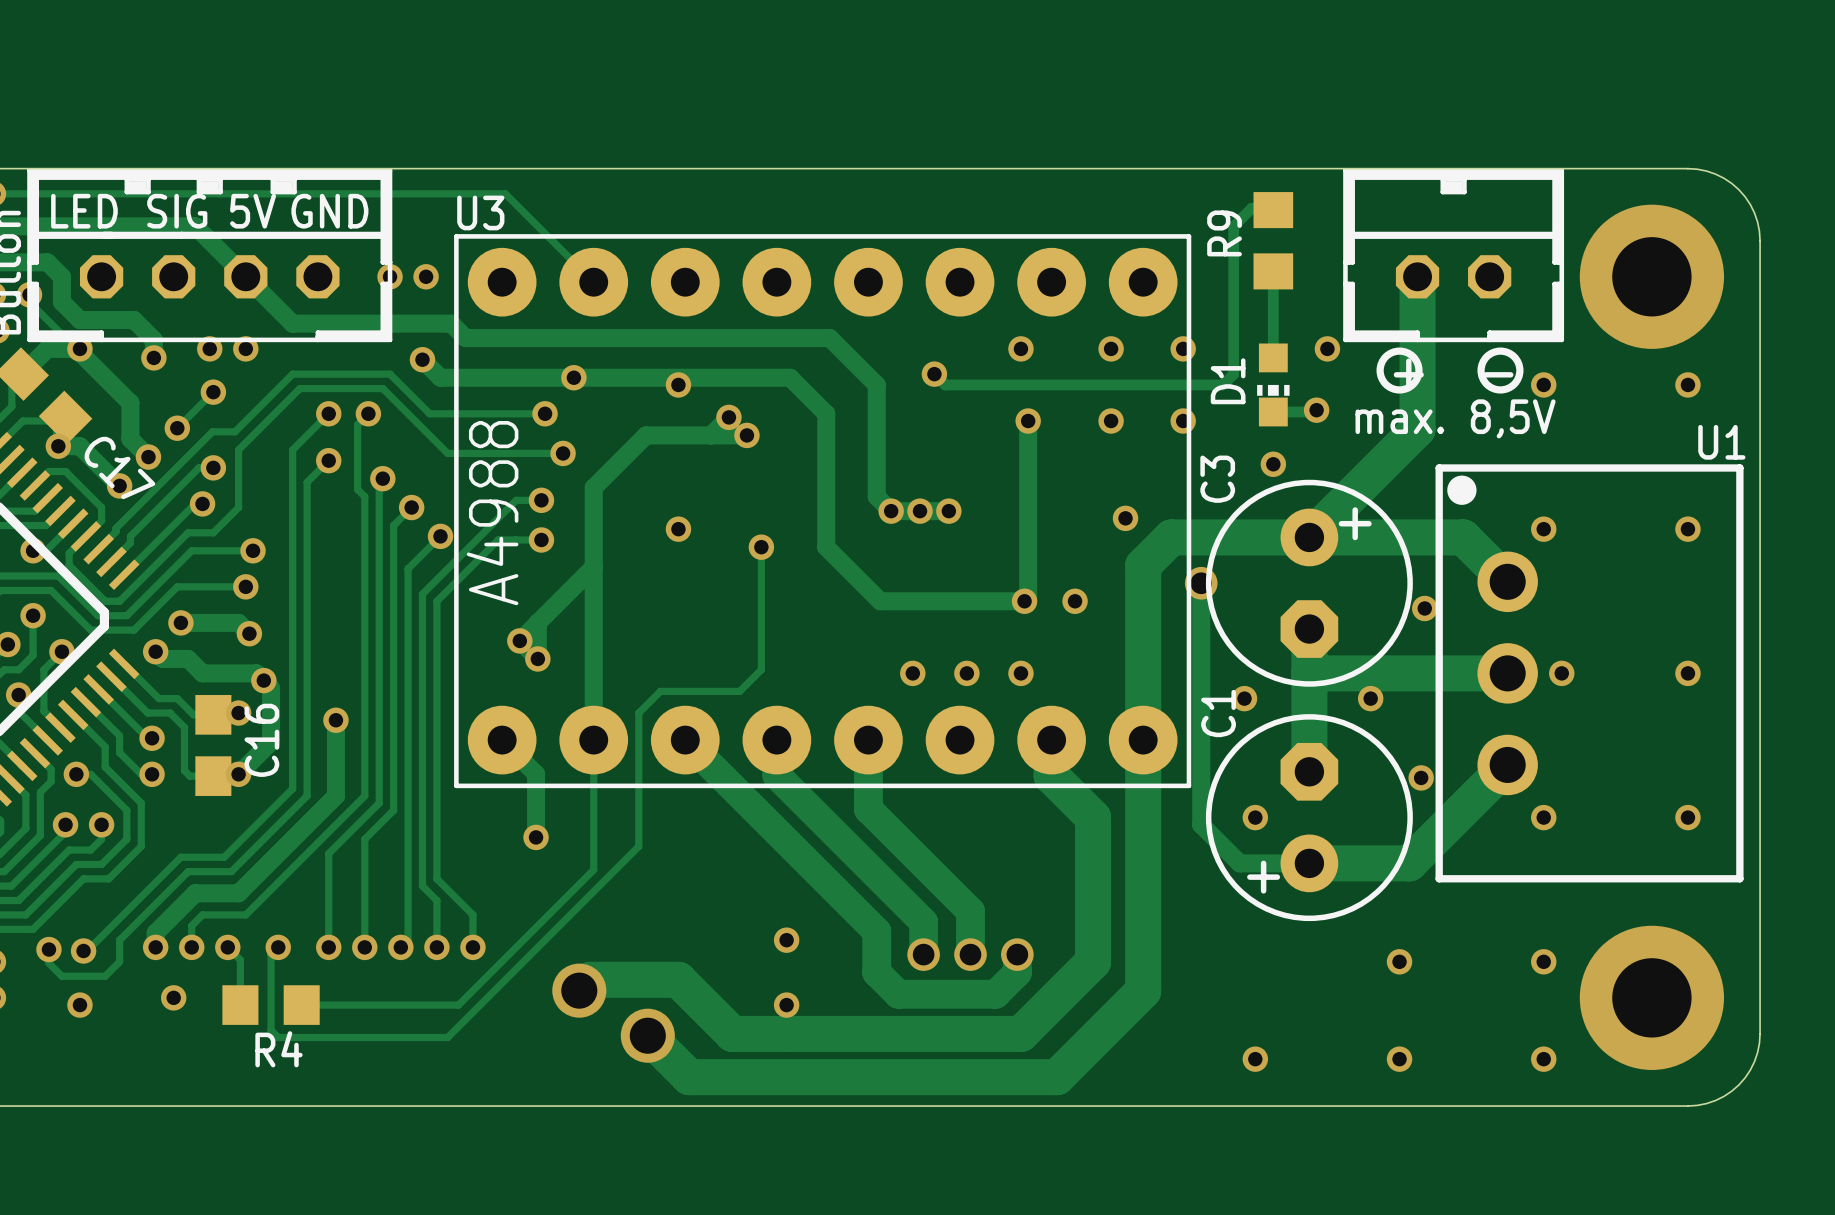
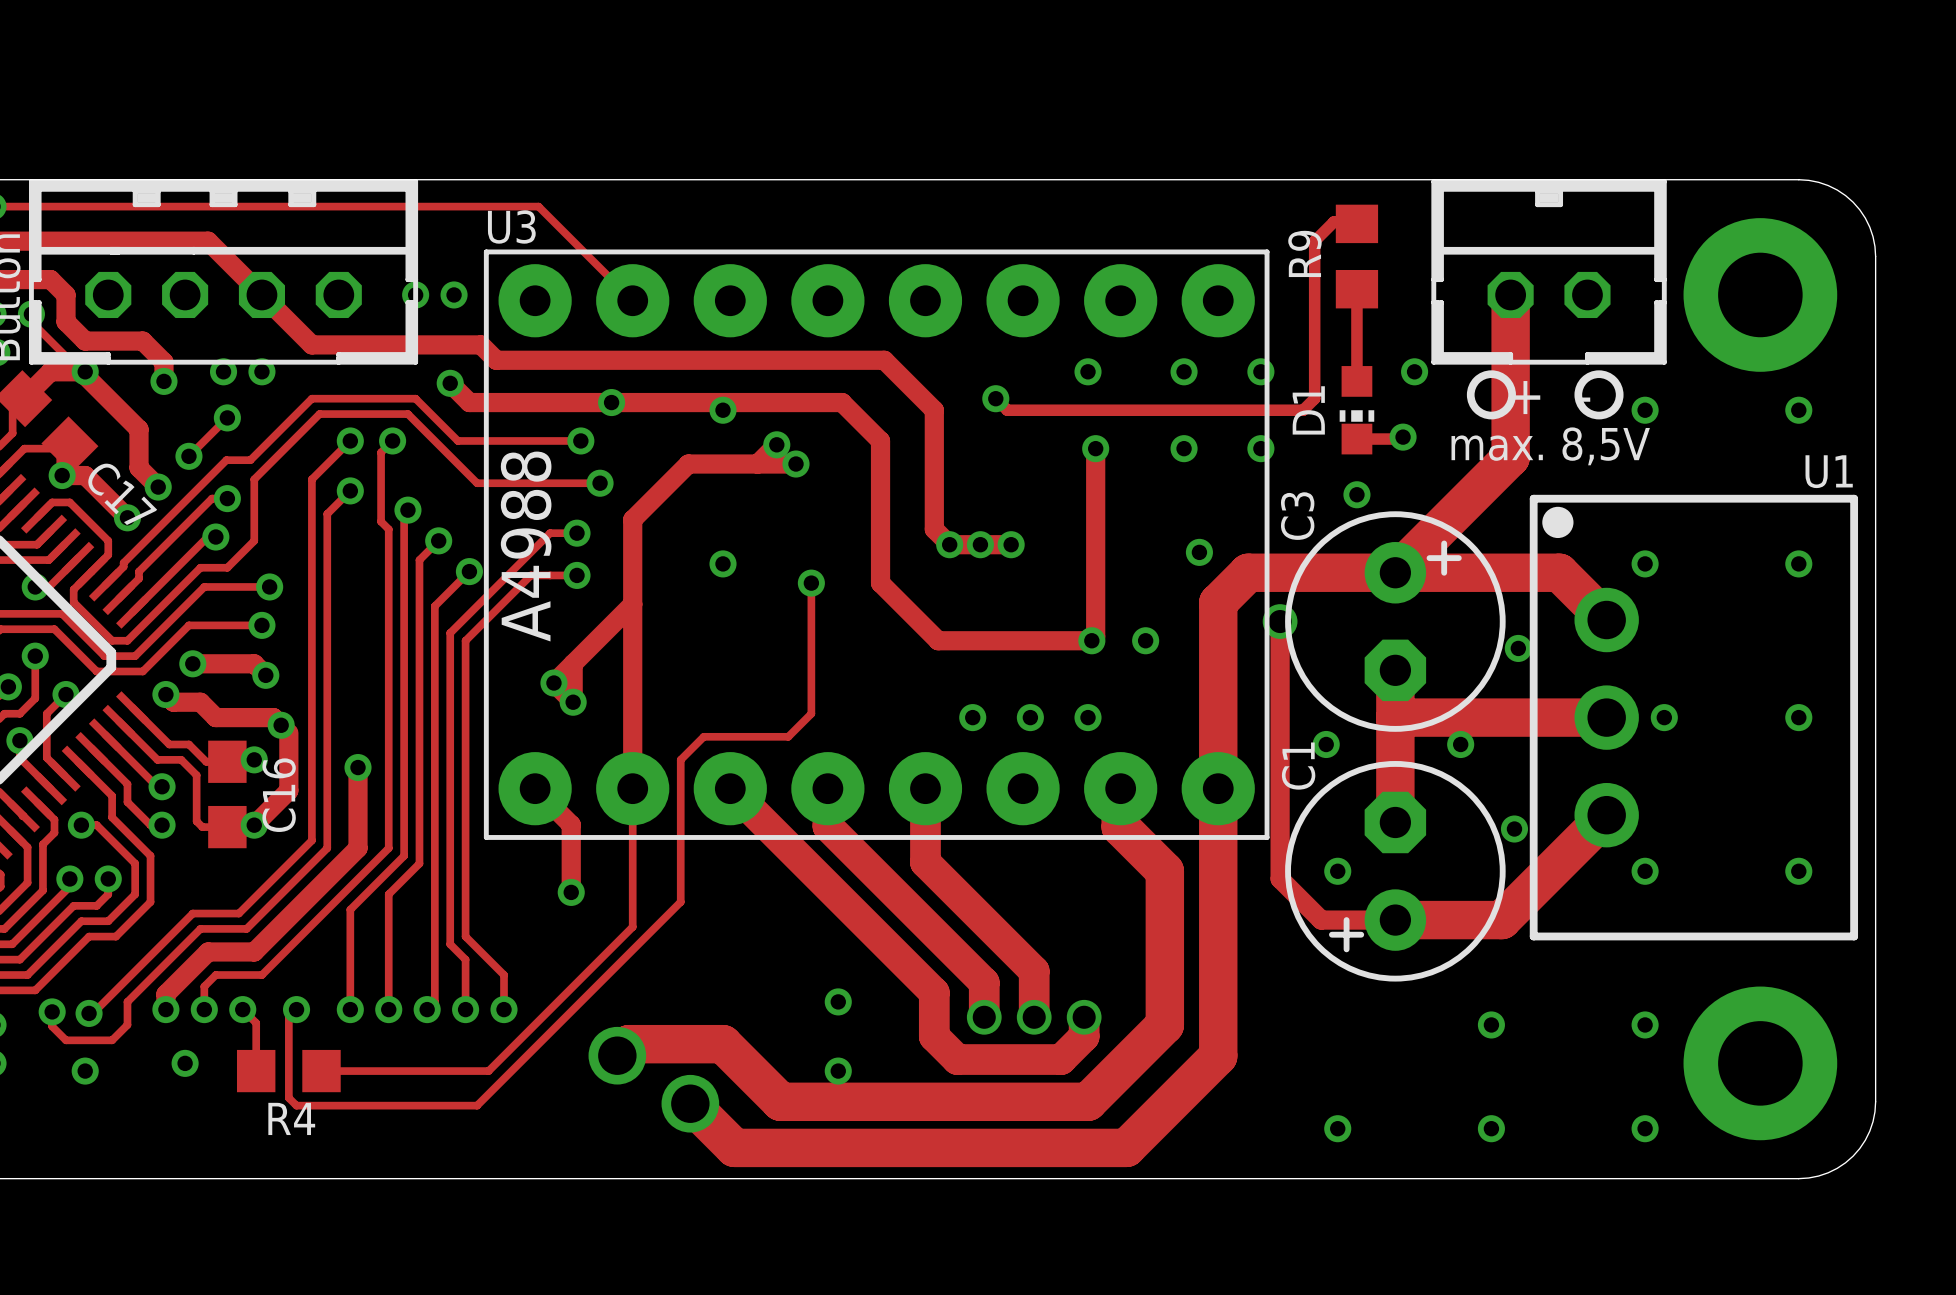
text: LED (84, 211) -> none
text: SIG (177, 211) -> none
text: 5V (253, 211) -> none
text: GND (329, 211) -> none

